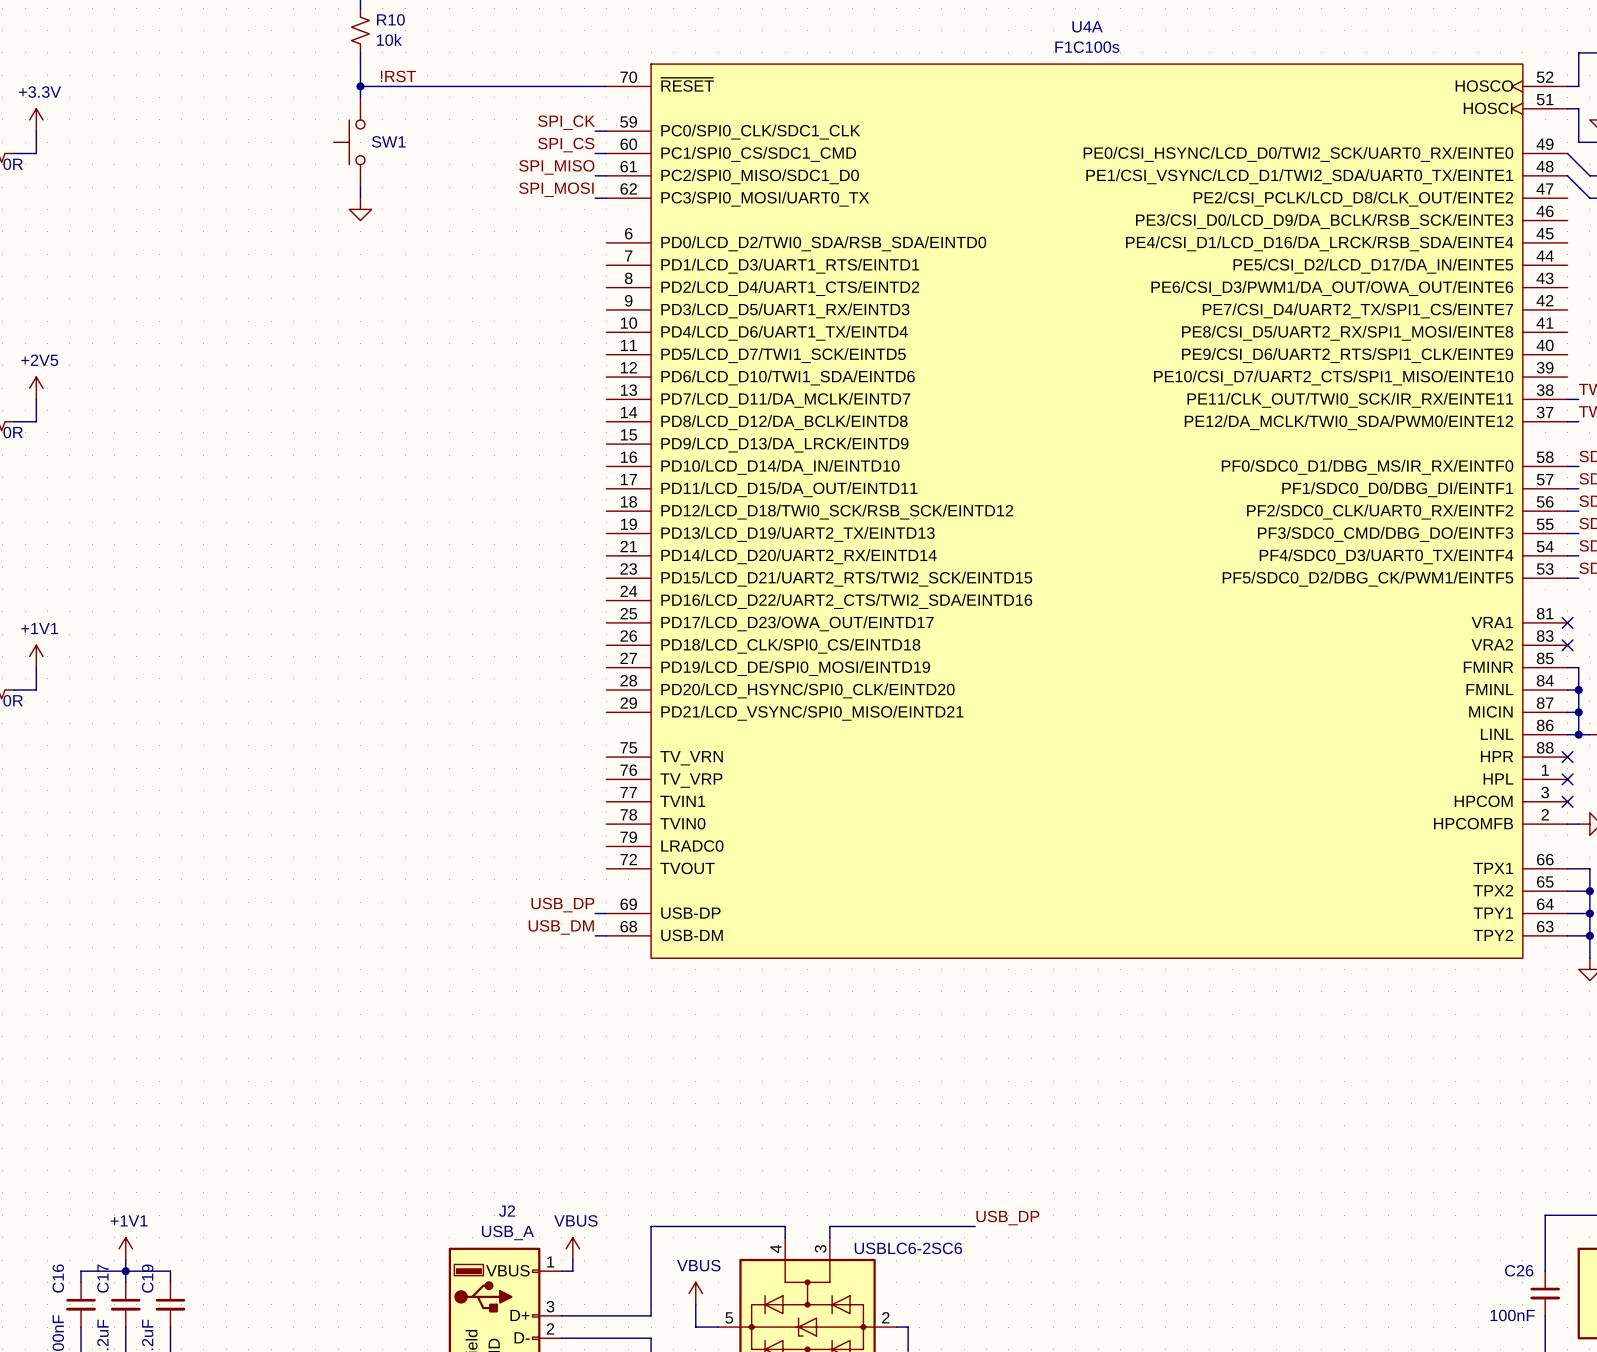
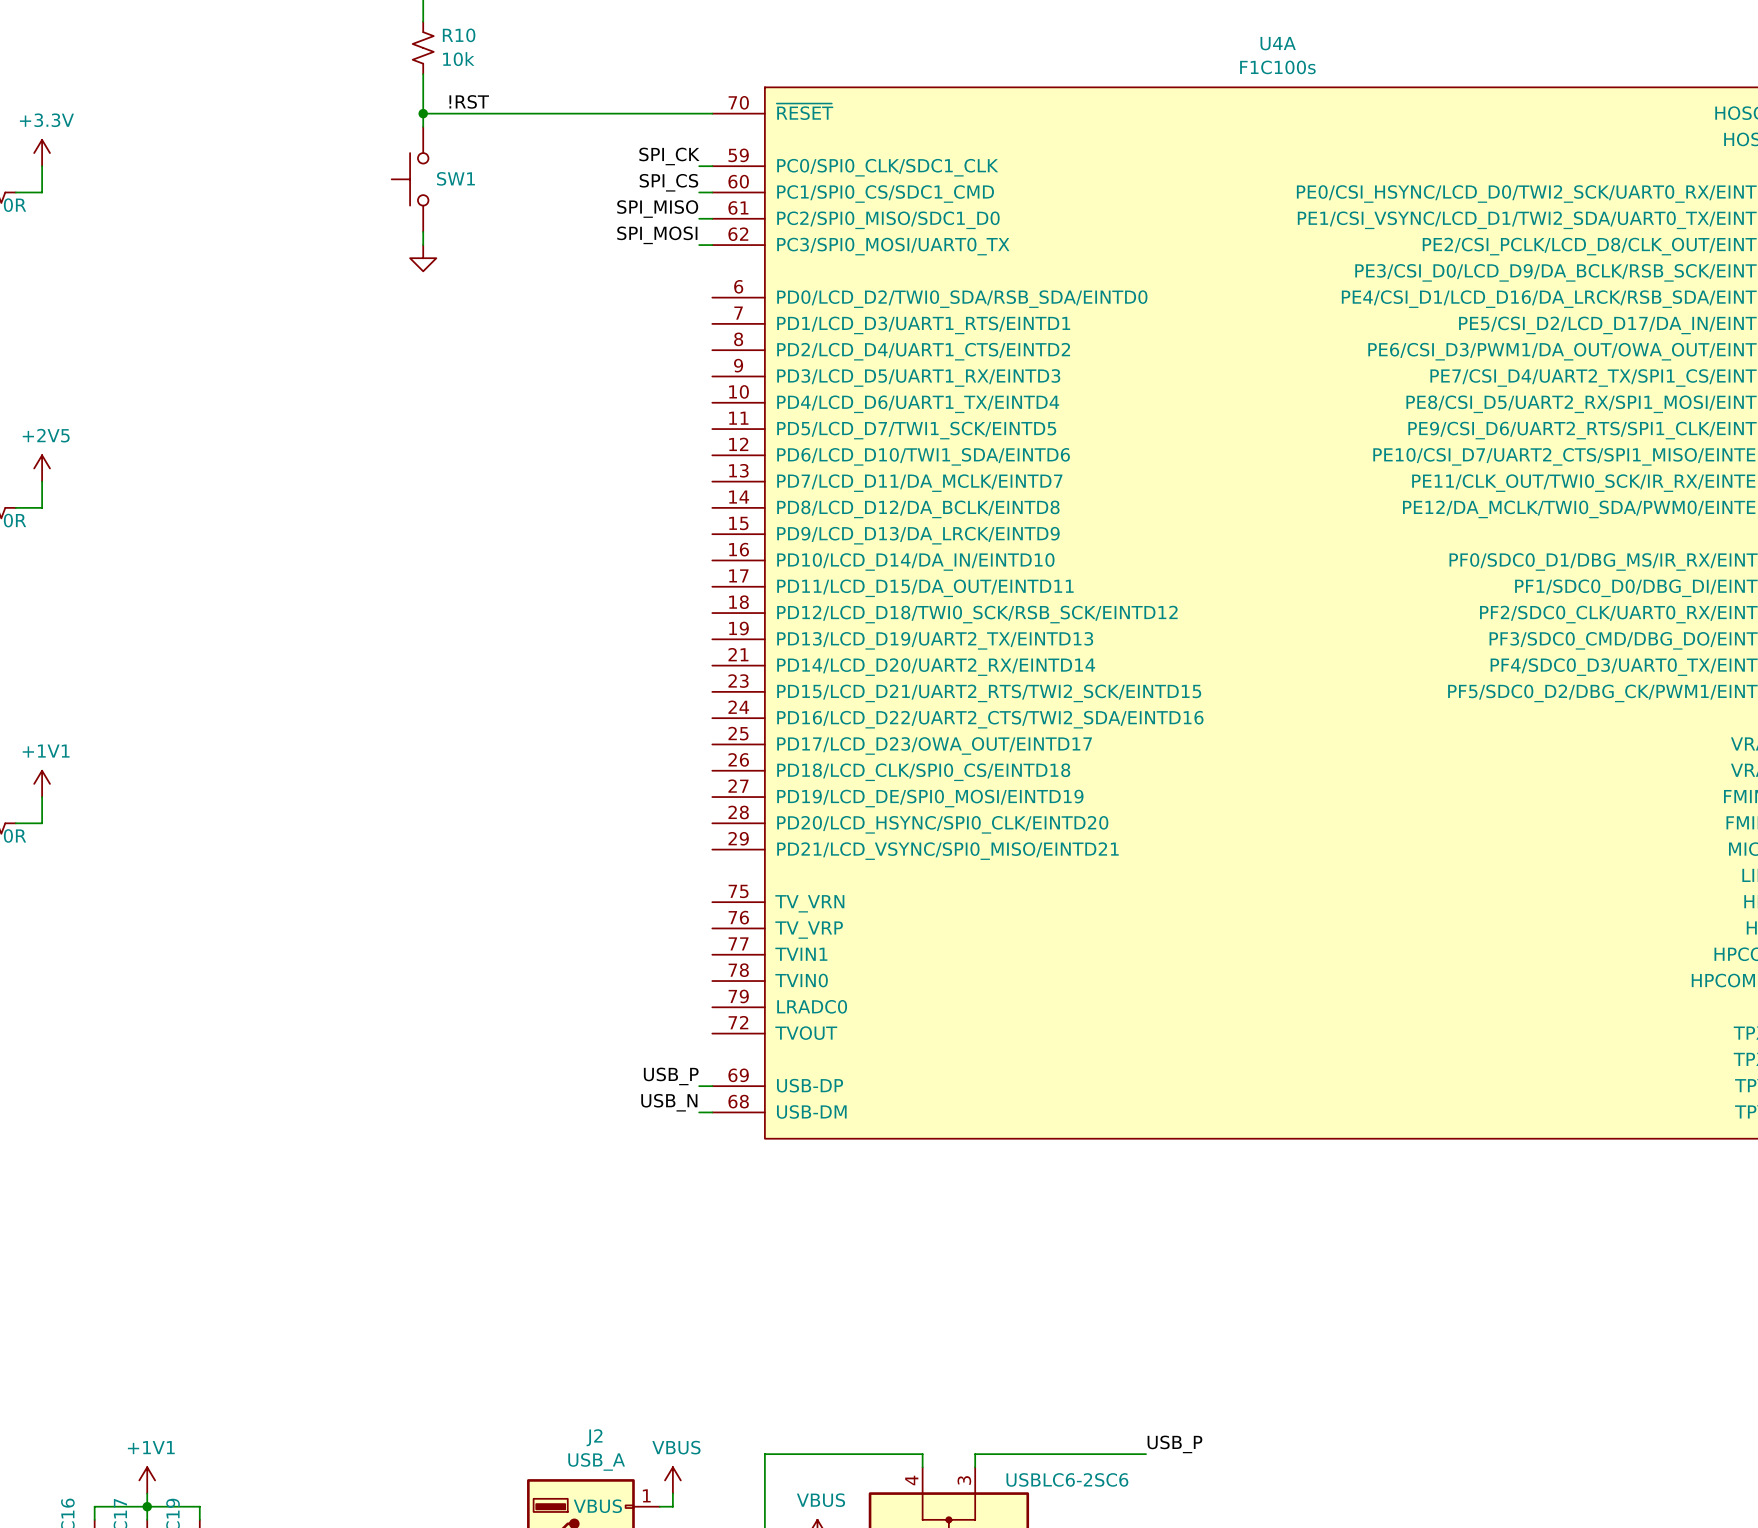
label: USB_DP (562, 905) -> USB_P (671, 1076)
label: USB_DM (561, 927) -> USB_N (669, 1102)
label: USB_DP (1007, 1218) -> USB_P (1174, 1444)

